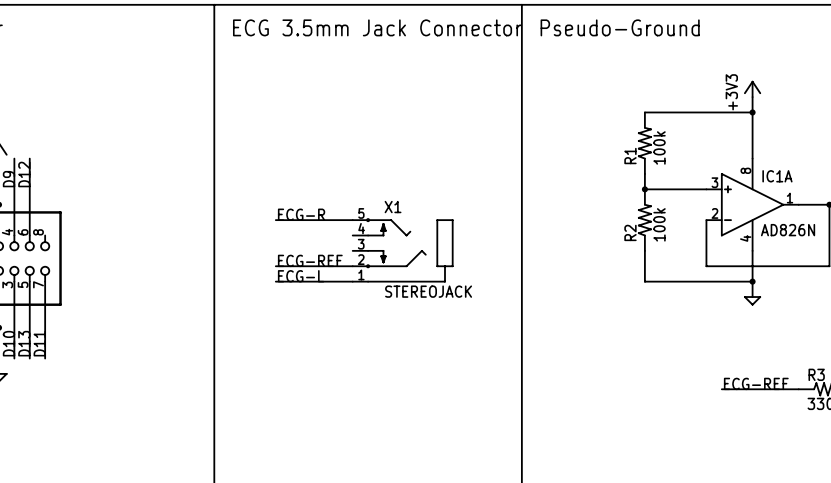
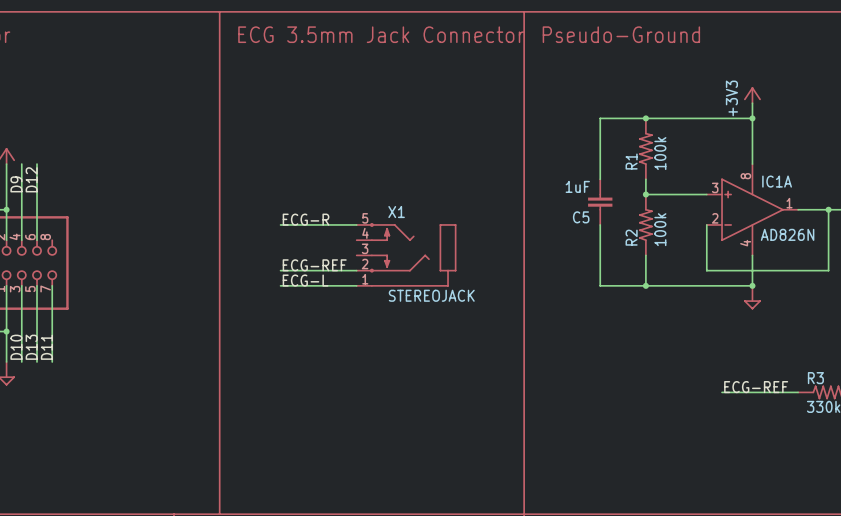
wire: none -> (645, 118) (600, 118) (600, 179)
junction: none -> (645, 118)
C5: none -> 1uF (600, 202)
wire: none -> (600, 224) (600, 285) (645, 285)
junction: none -> (645, 285)

